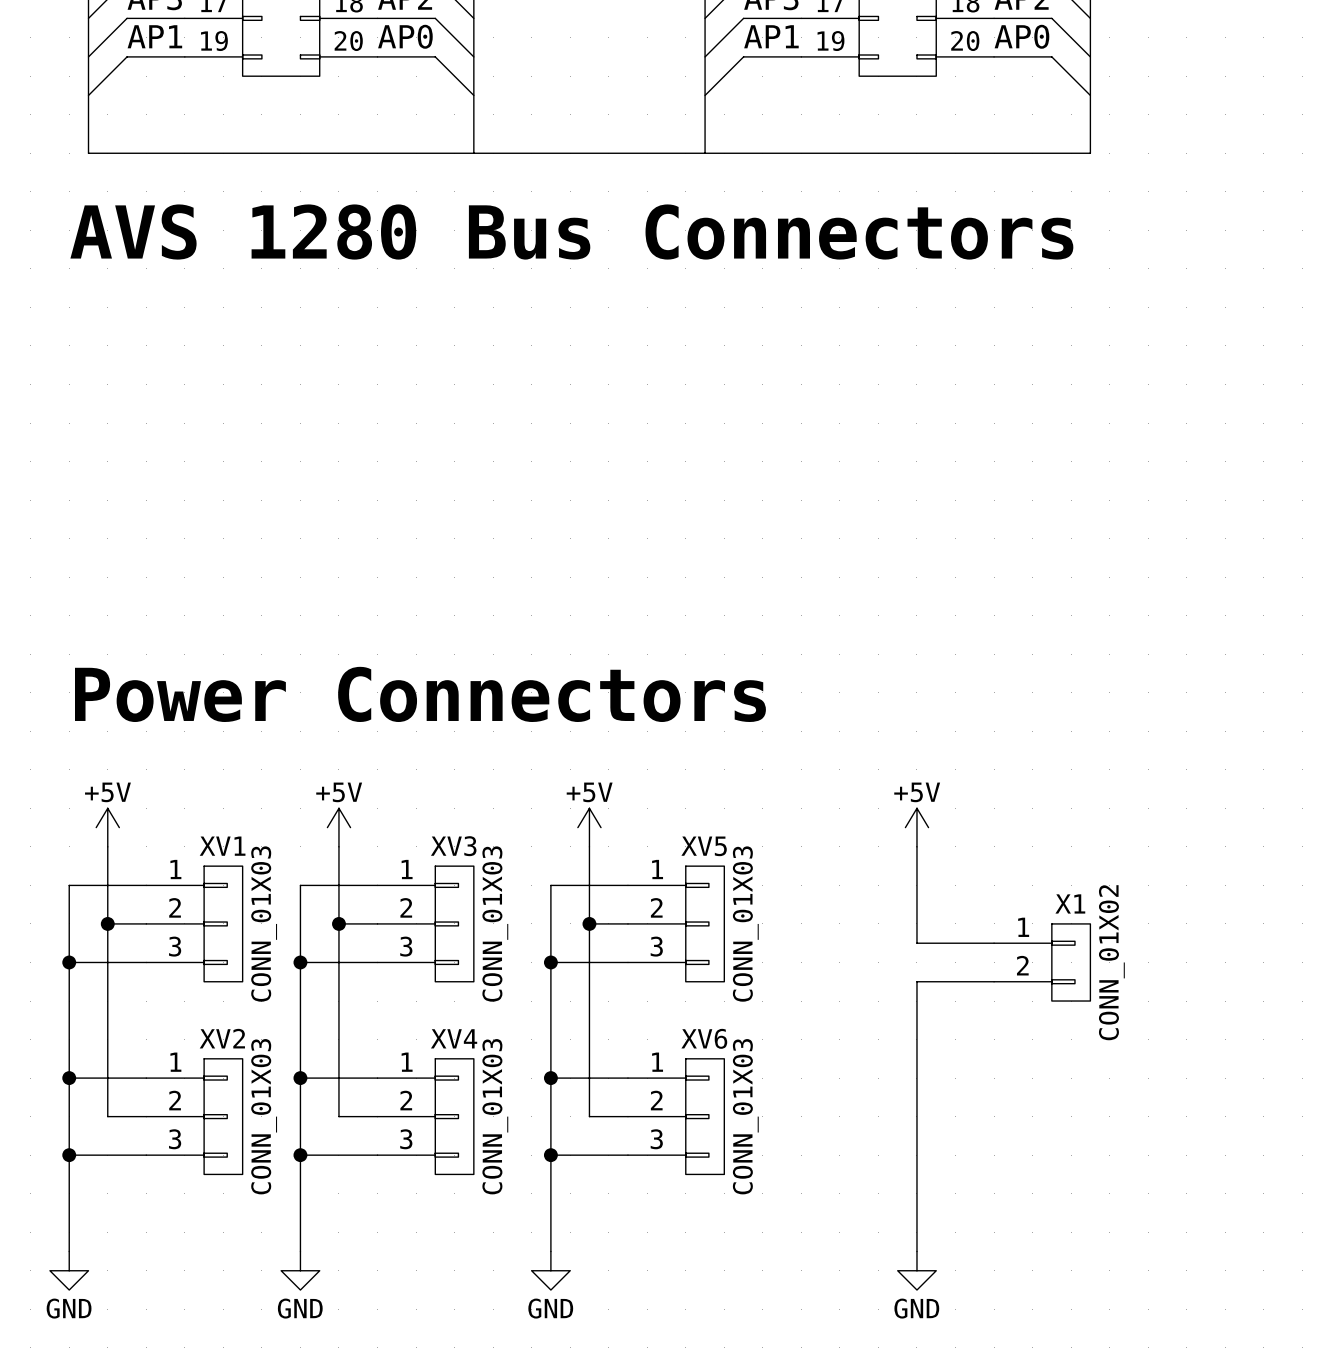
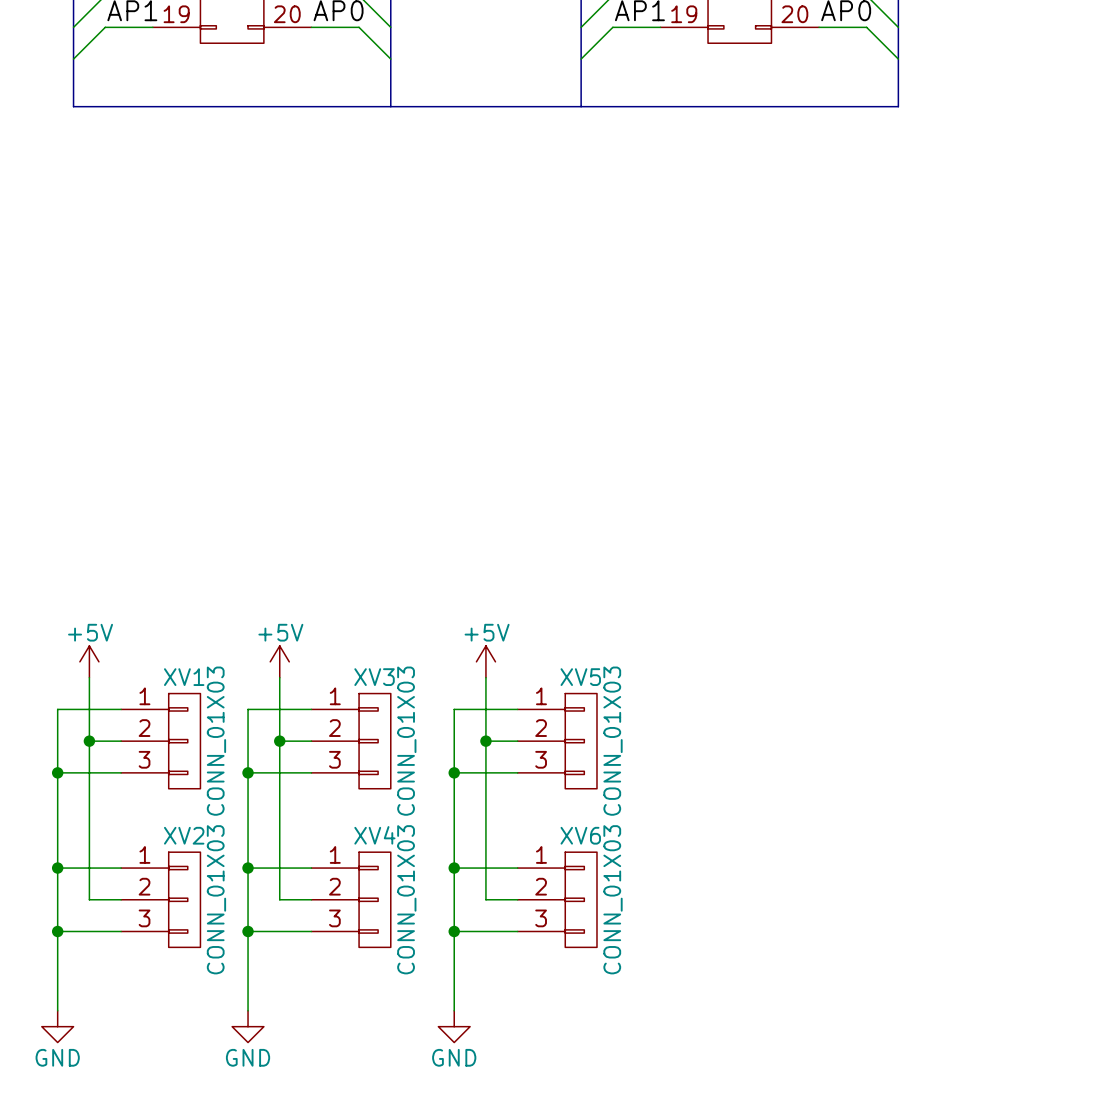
text: AVS 1280 Bus Connectors (571, 232) -> none
text: Power Connectors (420, 694) -> none
power symbol: +5V (916, 827) -> none
wire: (916, 846) (916, 943) (994, 943) -> none
X1: CONN_01X02 (1042, 962) -> none
wire: (994, 981) (916, 981) (916, 1251) -> none
power symbol: GND (916, 1270) -> none

